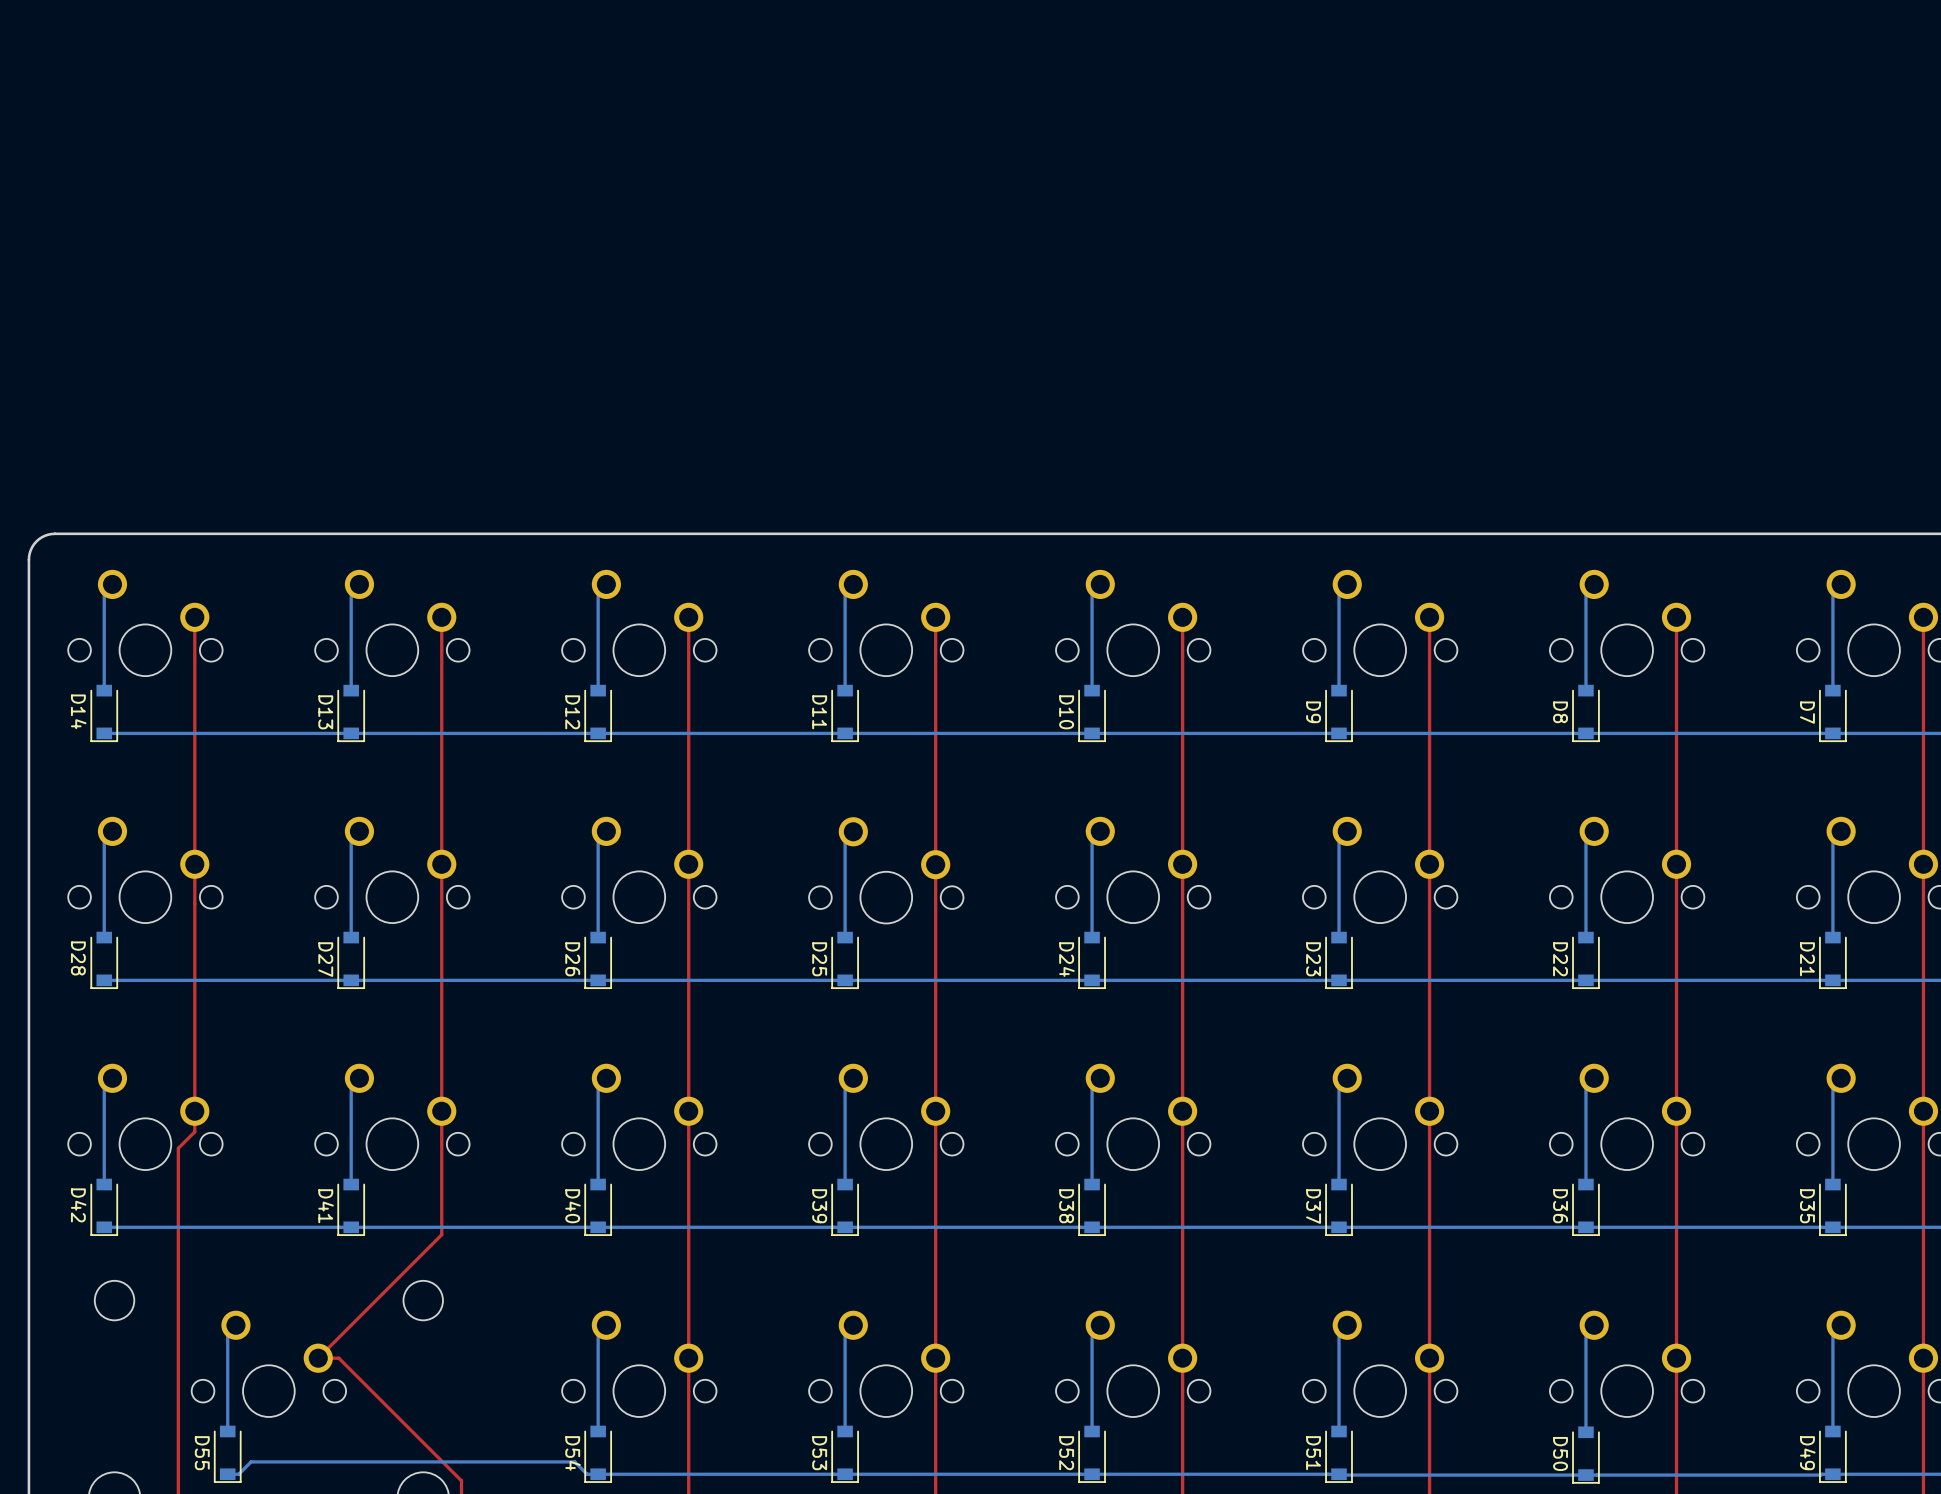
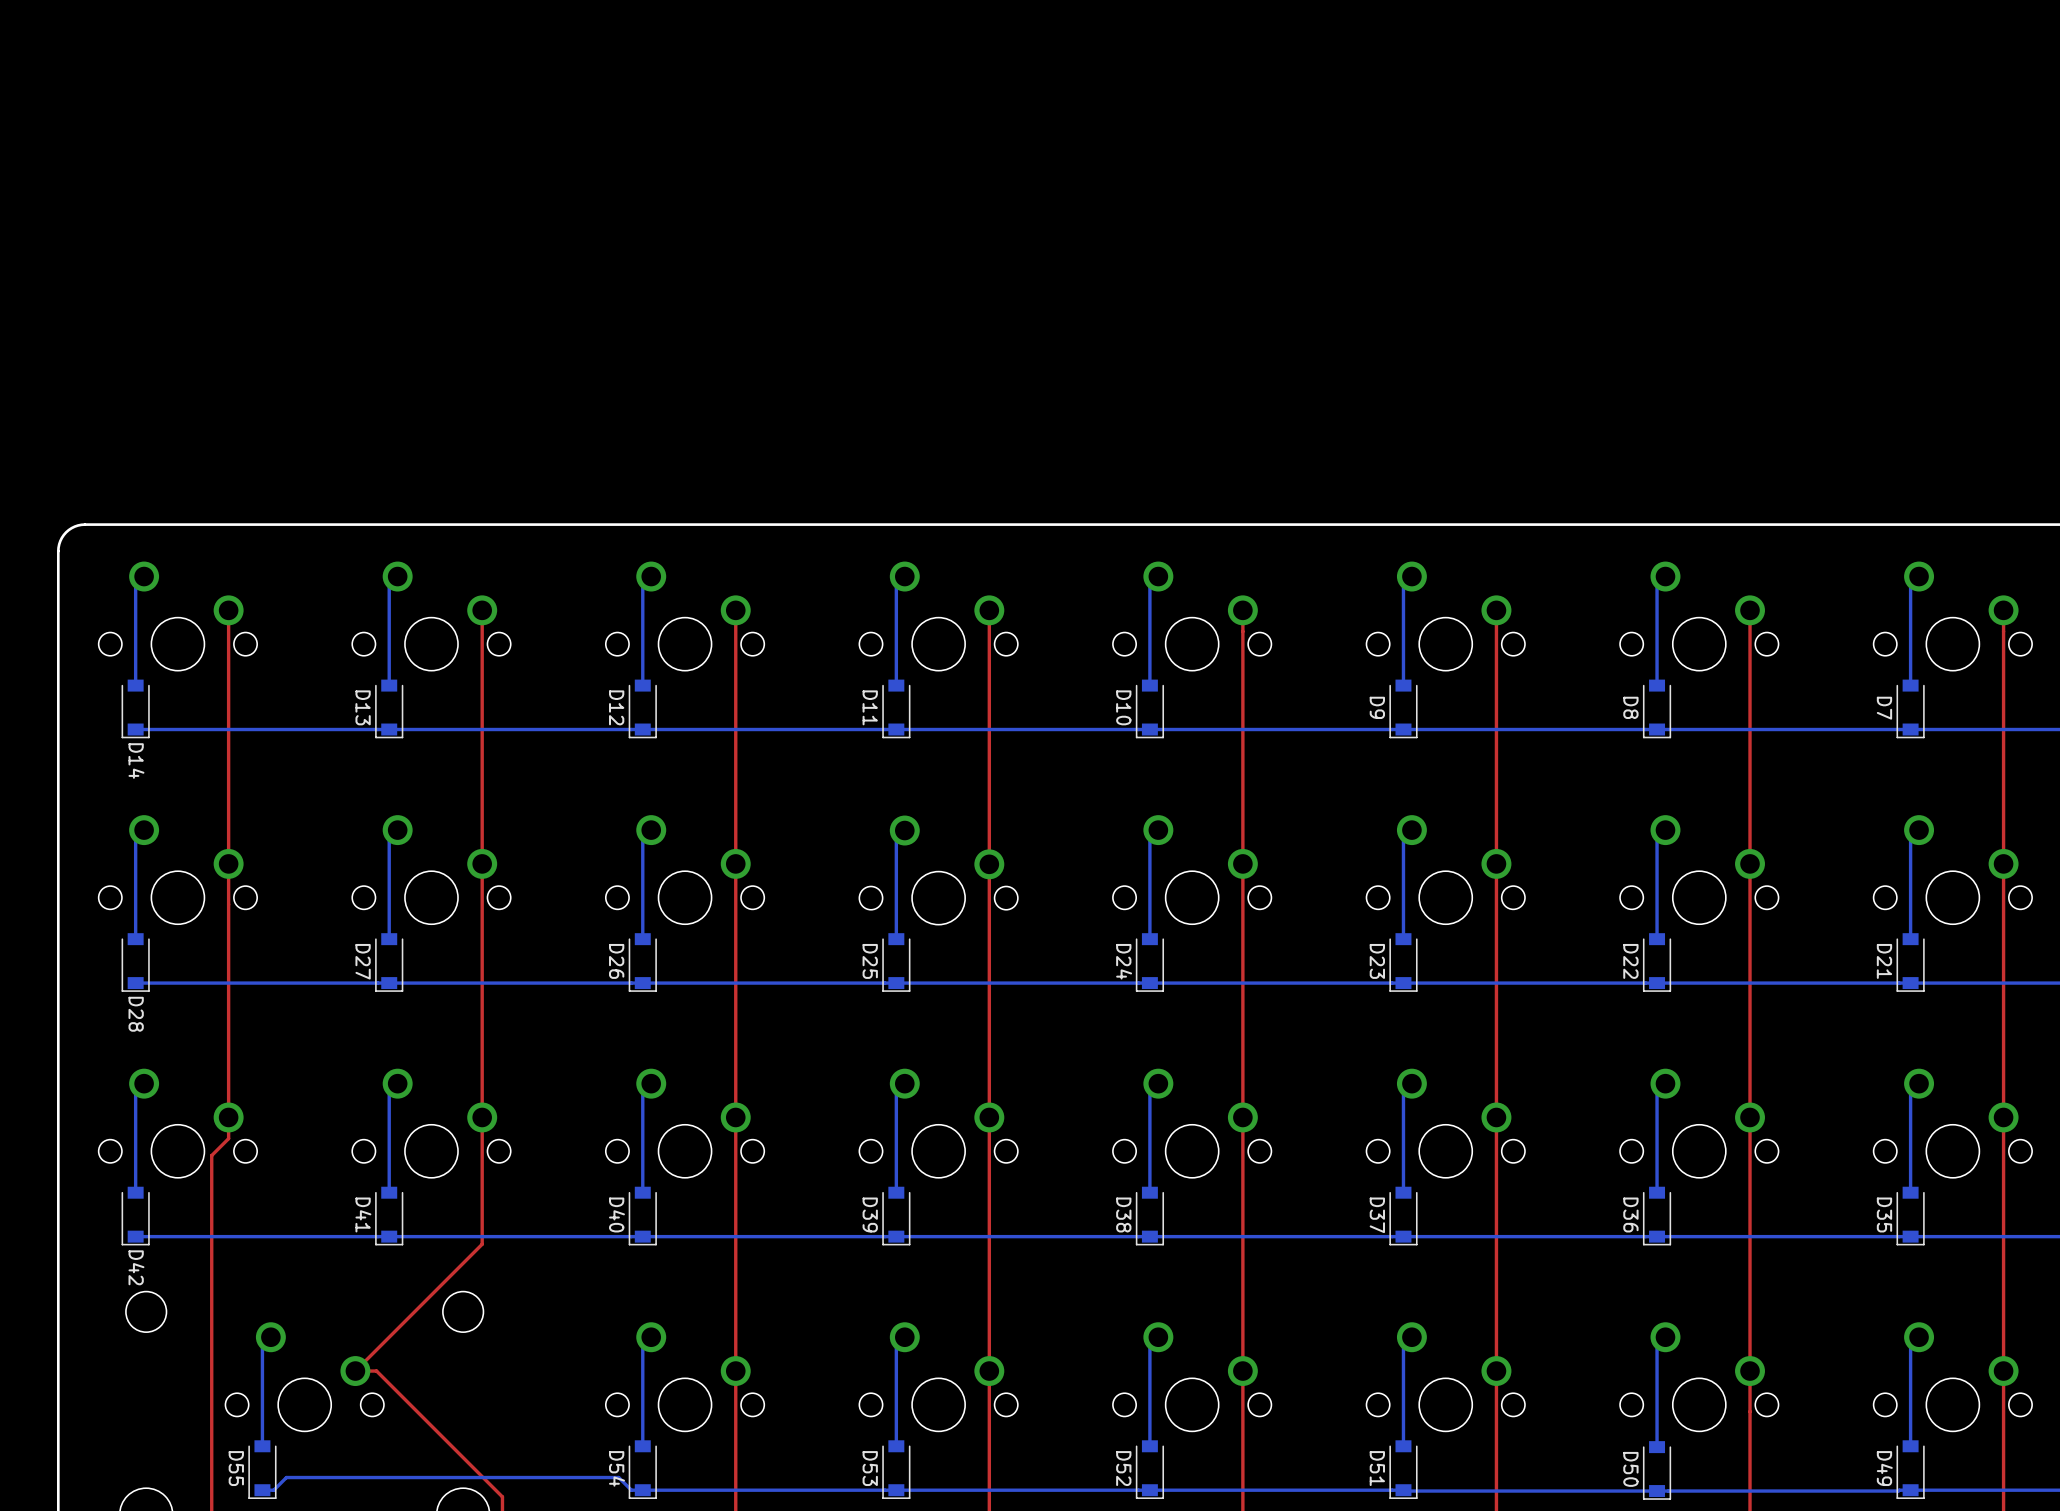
D14 name position: D14 (78, 711) -> D14 (136, 761)
D28 name position: D28 (78, 958) -> D28 (136, 1014)
D42 name position: D42 (78, 1205) -> D42 (136, 1267)

